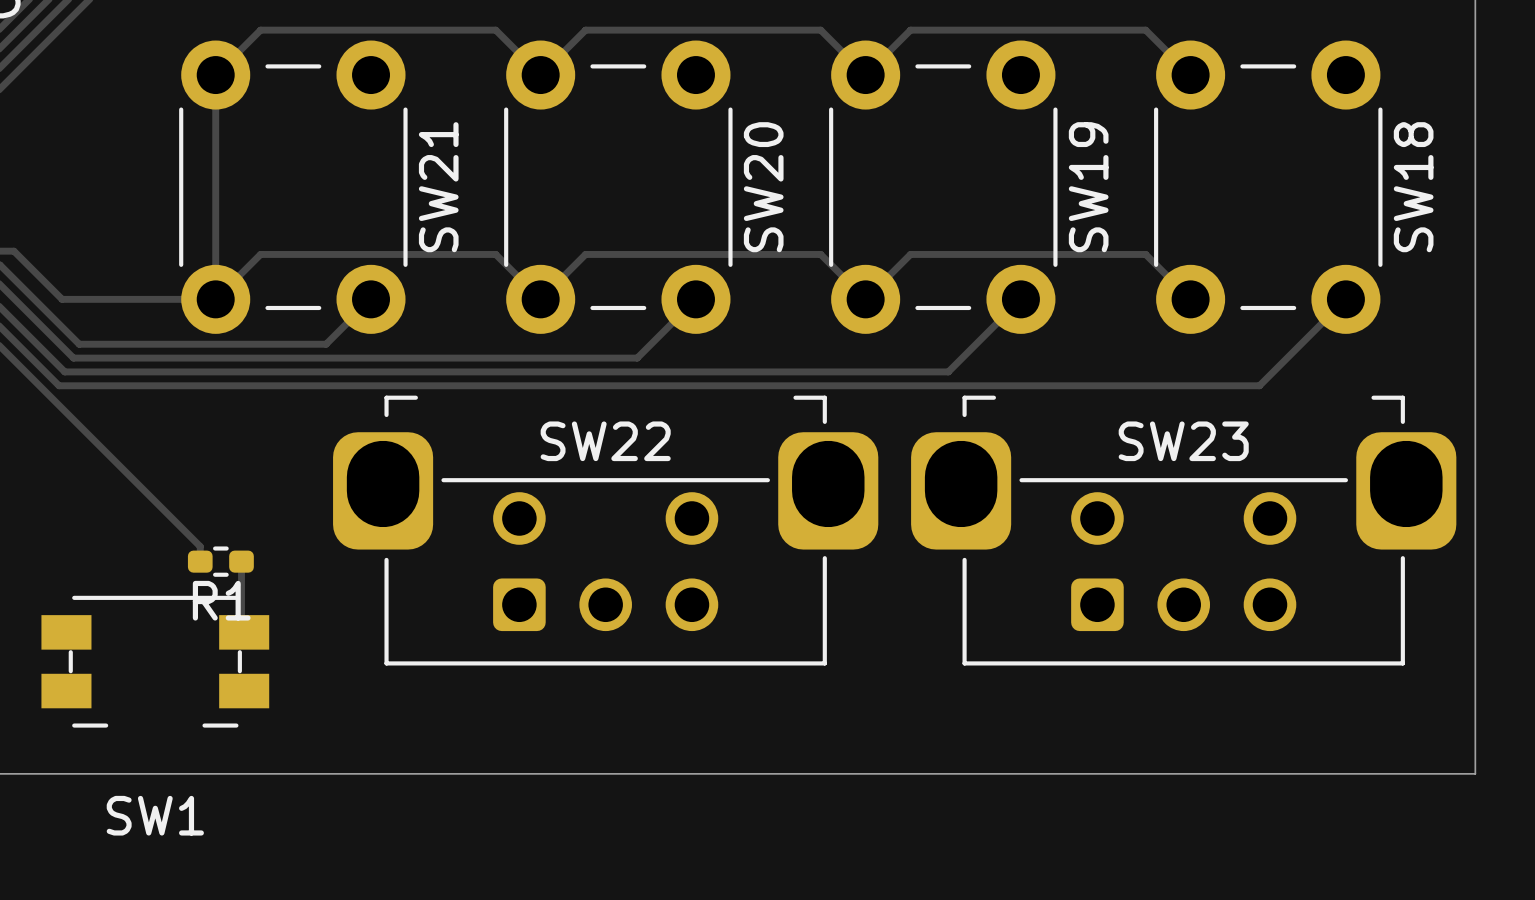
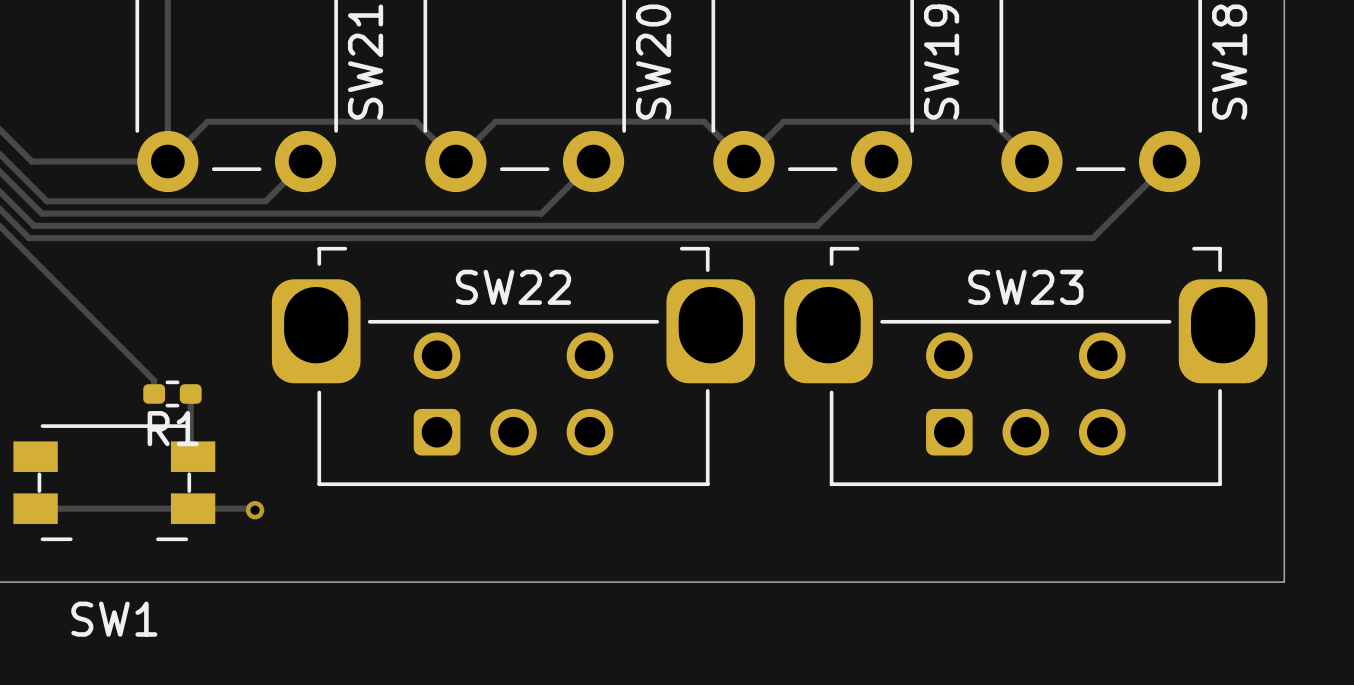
track: none -> (35, 508) (253, 508) (255, 510)
via: none -> (255, 510)

